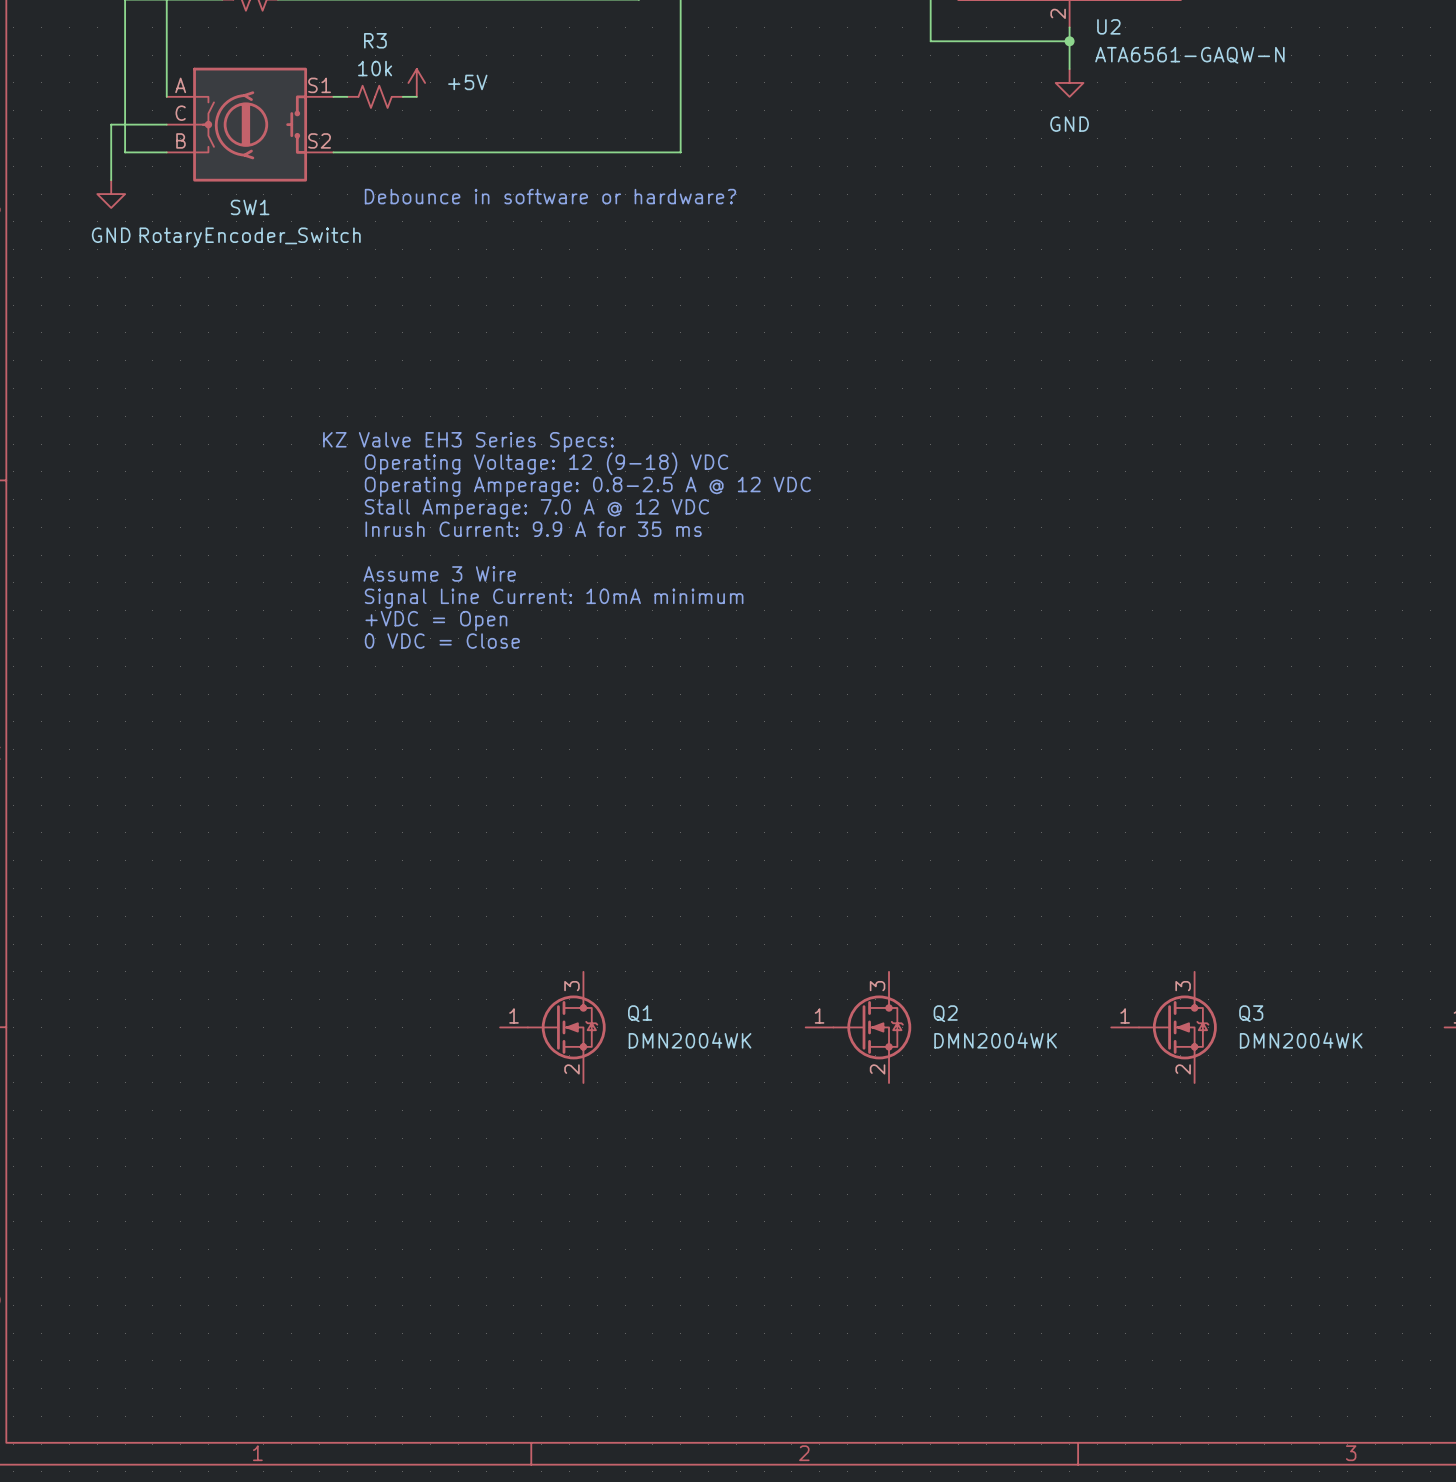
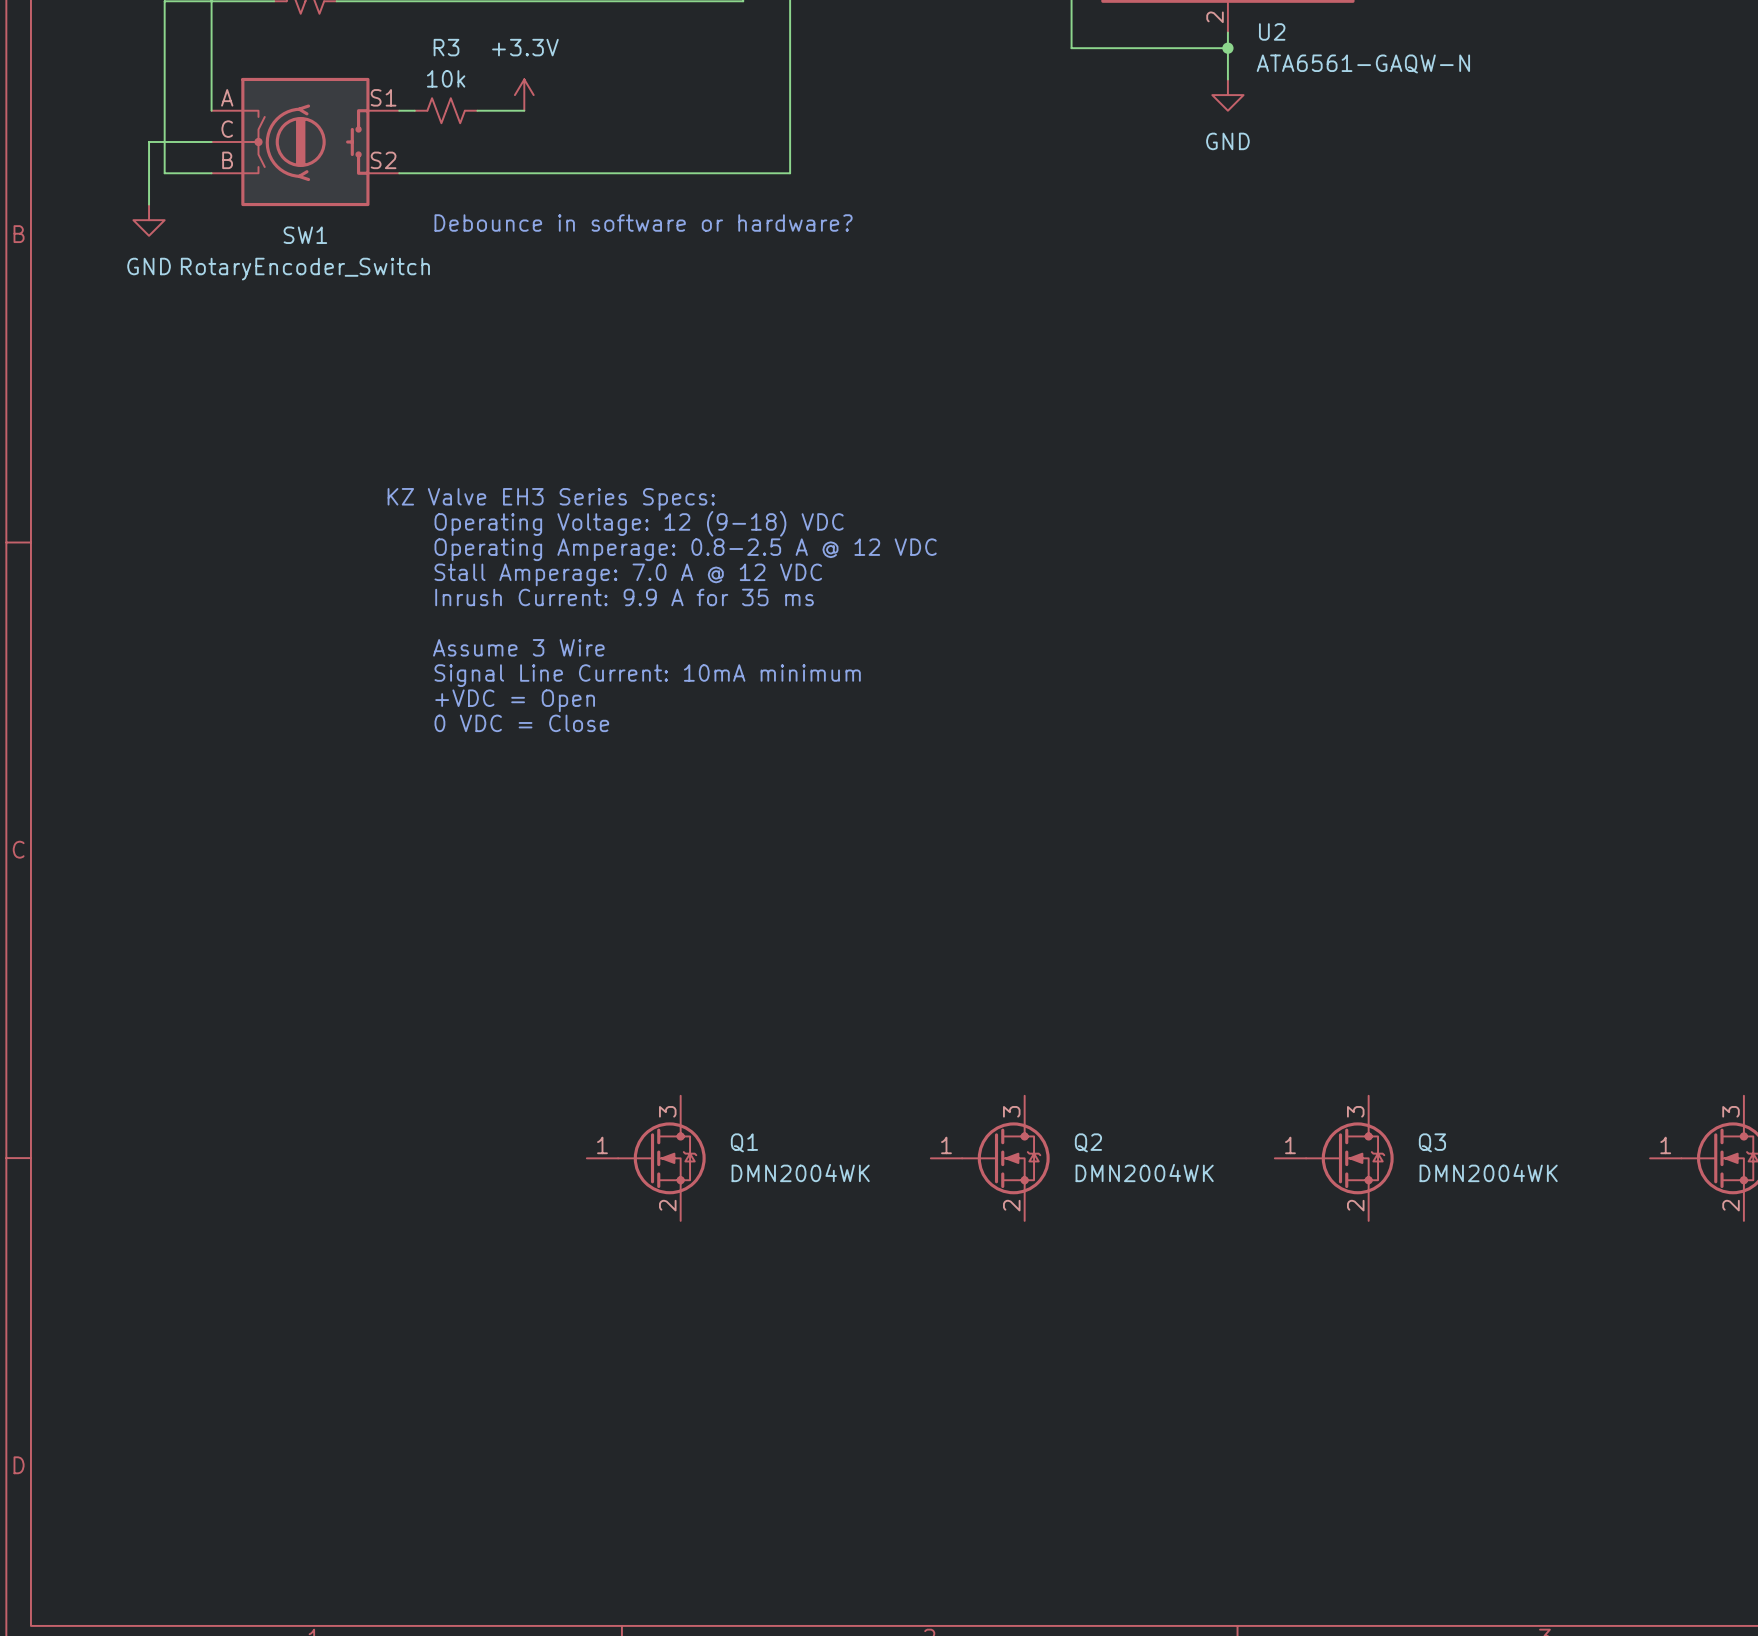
power symbol: +5V (416, 82) -> none
power symbol: none -> +3.3V (524, 95)
wire: none -> (493, 110) (524, 110)

